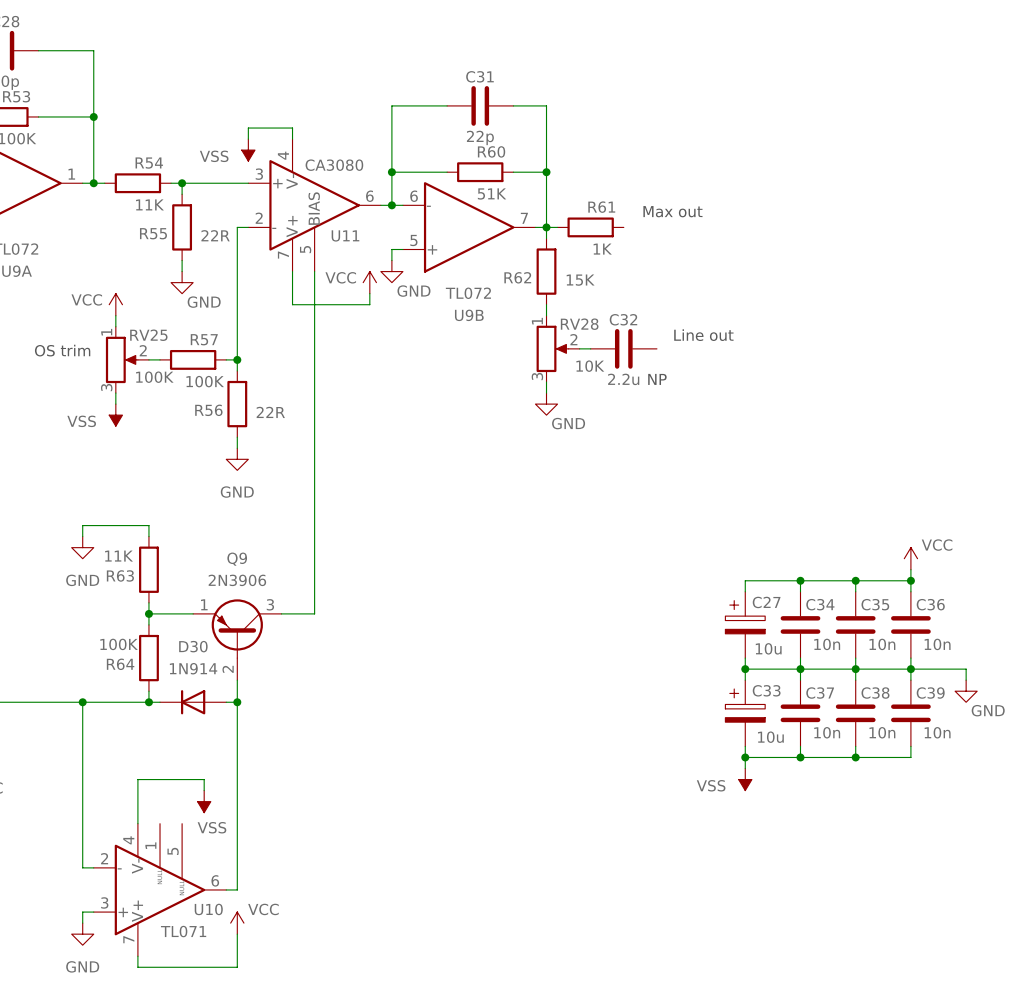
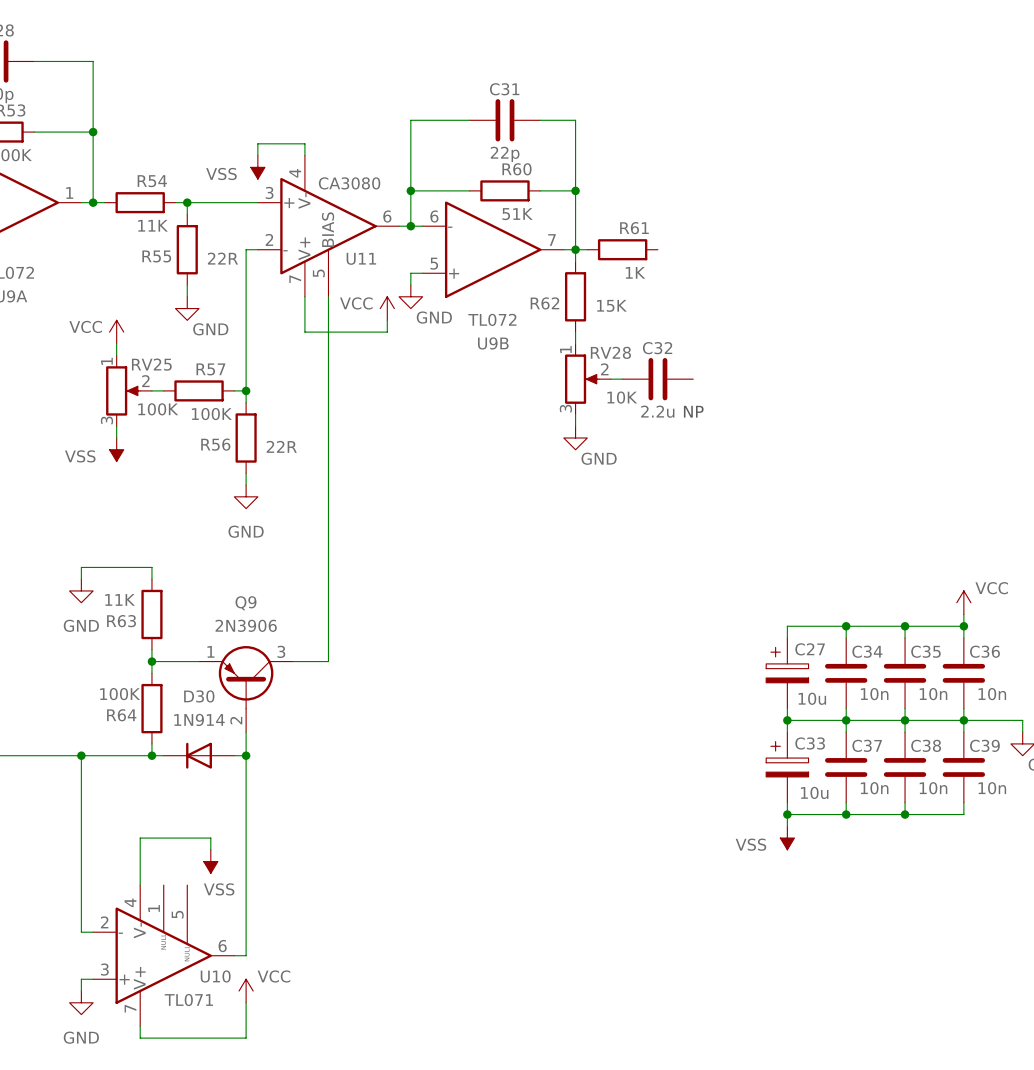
text: Max out (672, 211) -> none
text: Line out (703, 335) -> none
text: OS trim (62, 350) -> none

